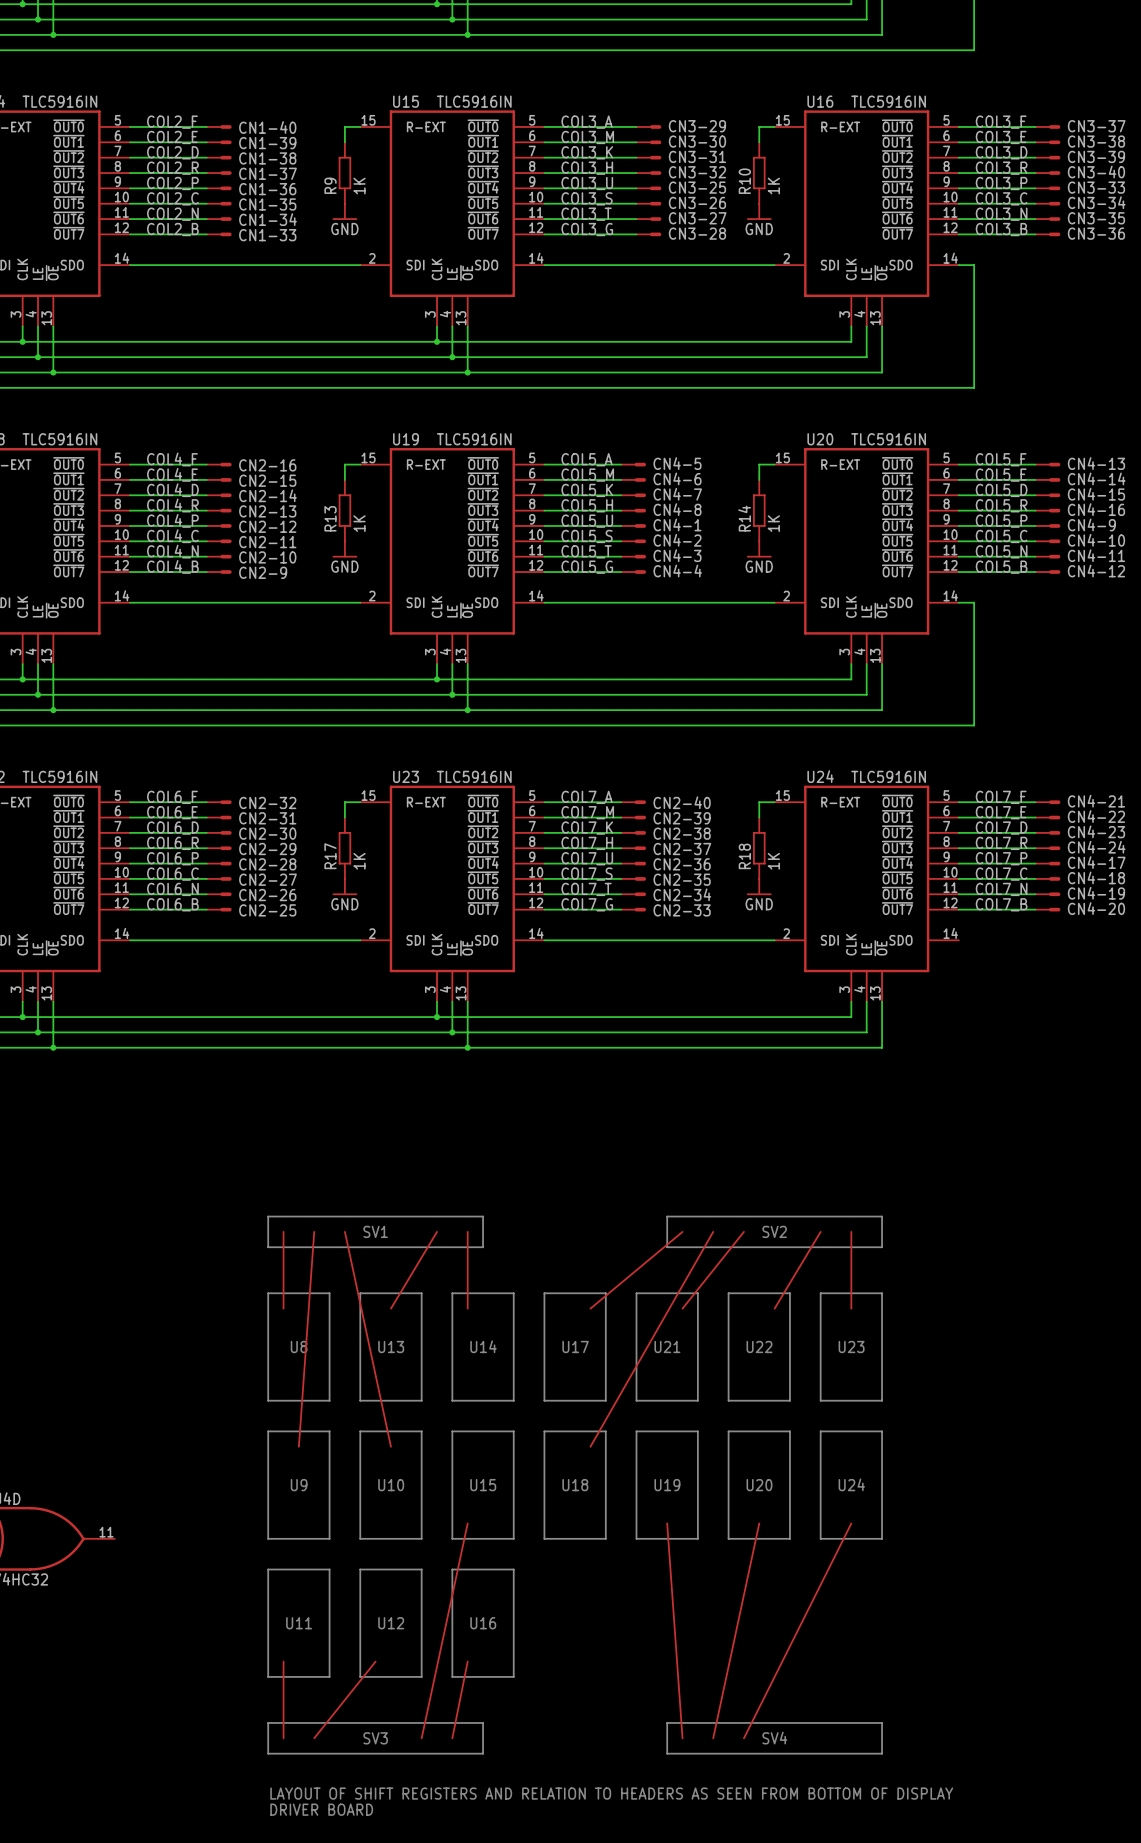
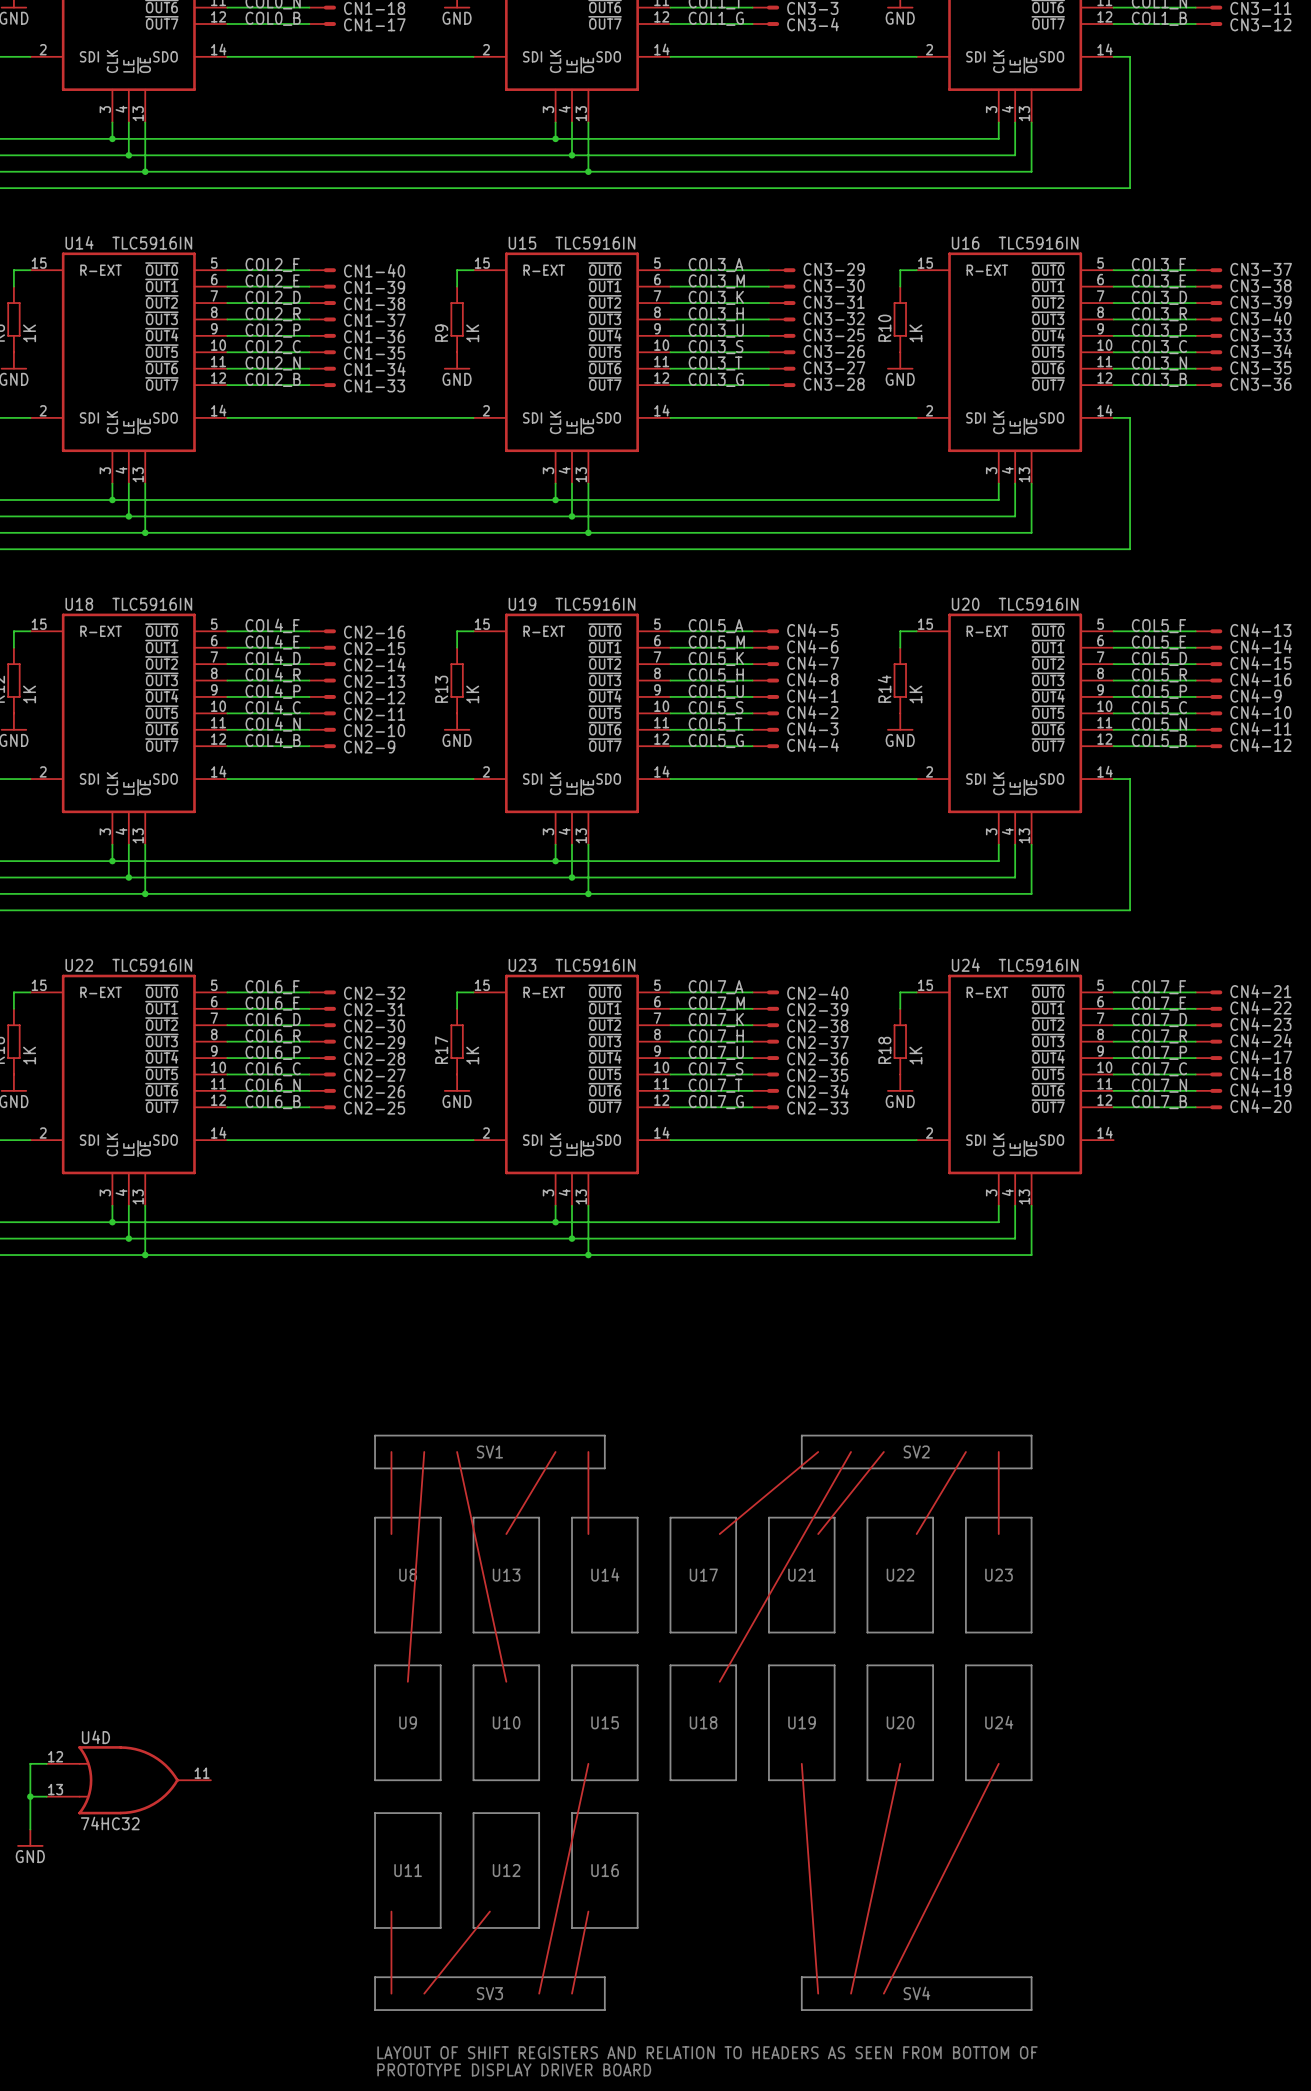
text: LAYOUT OF SHIFT REGISTERS AND RELATION TO HEADERS AS SEEN FROM BOTTOM OF DISPLAY (611, 1793) -> LAYOUT OF SHIFT REGISTERS AND RELATION TO HEADERS AS SEEN FROM BOTTOM OF (707, 2052)
text: DRIVER BOARD (321, 1809) -> PROTOTYPE DISPLAY DRIVER BOARD (514, 2069)

